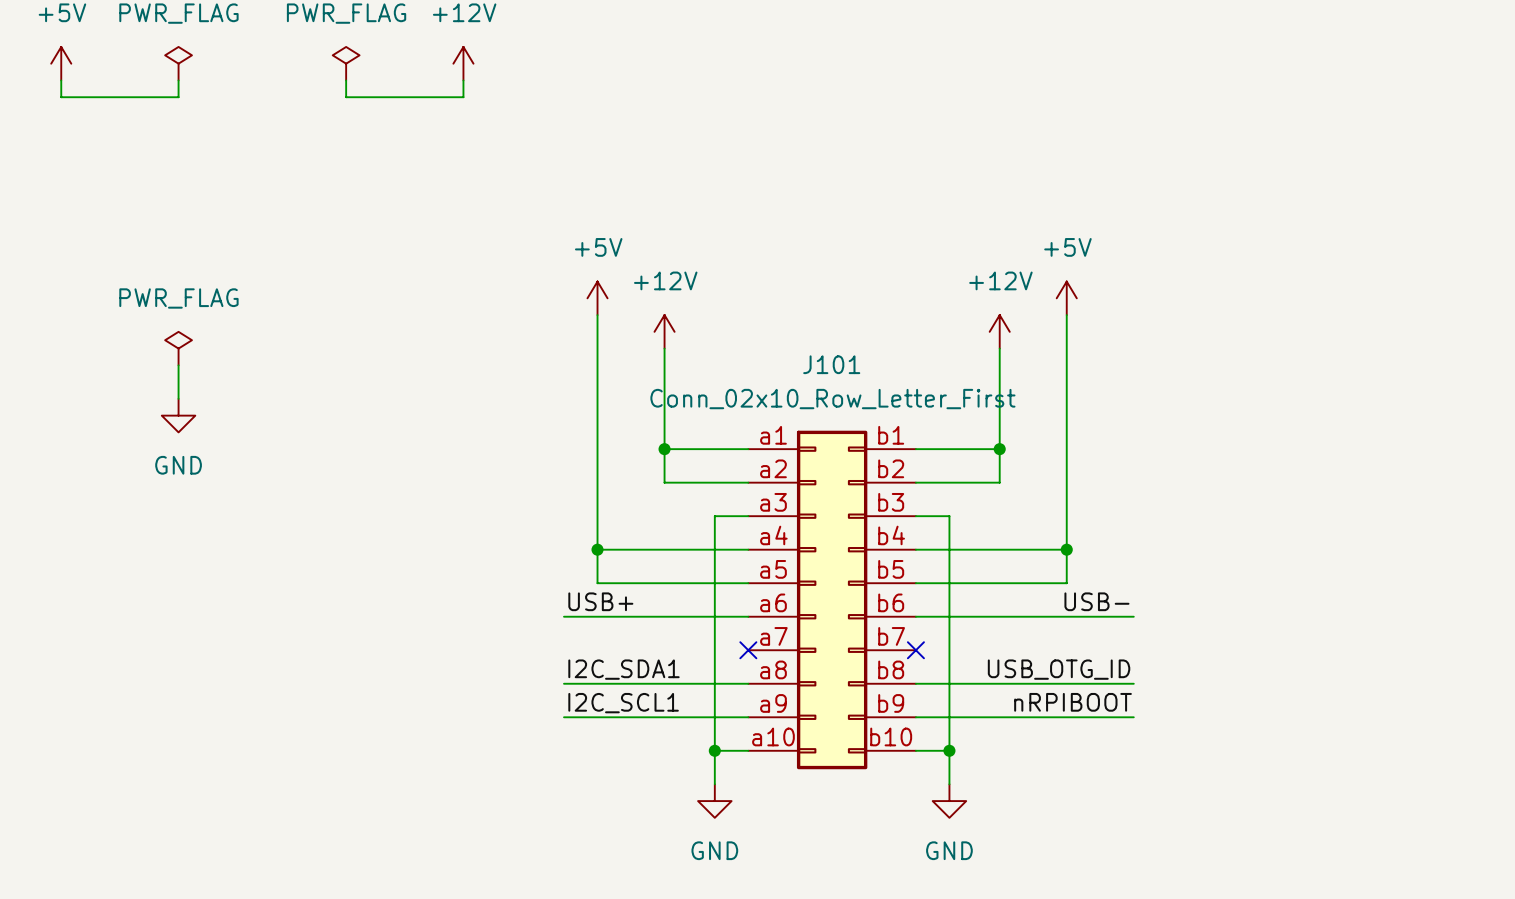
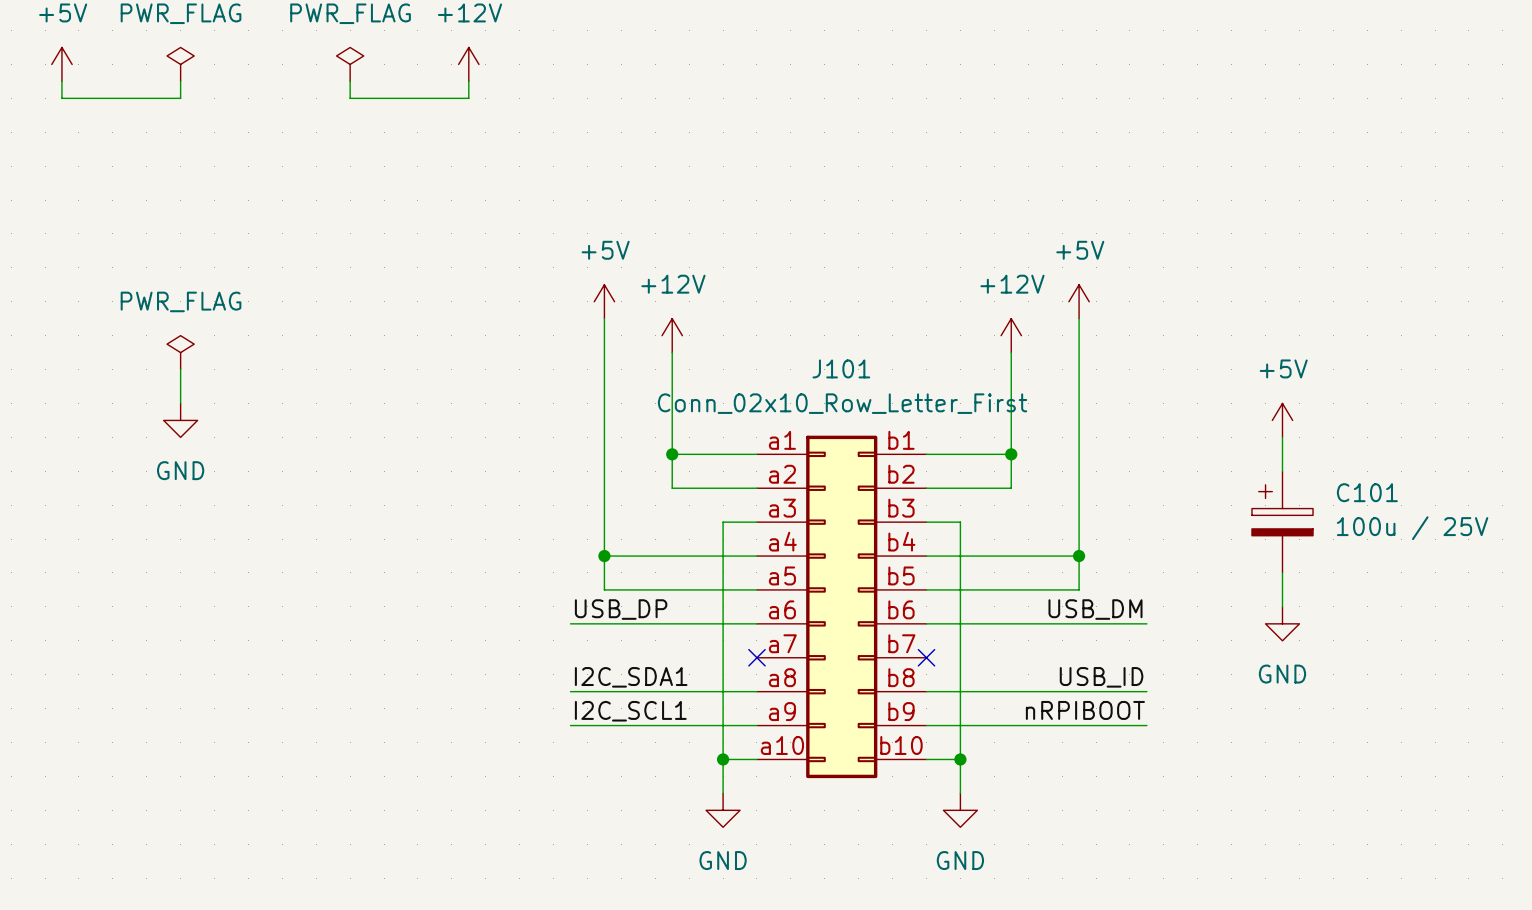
power symbol: none -> +5V (1282, 420)
wire: none -> (1282, 437) (1282, 471)
C101: none -> 100u / 25V (1282, 522)
wire: none -> (1282, 572) (1282, 606)
label: USB+ (600, 601) -> USB_DP (621, 609)
label: USB- (1096, 601) -> USB_DM (1095, 609)
power symbol: none -> GND (1282, 623)
label: USB_OTG_ID (1059, 669) -> USB_ID (1101, 677)

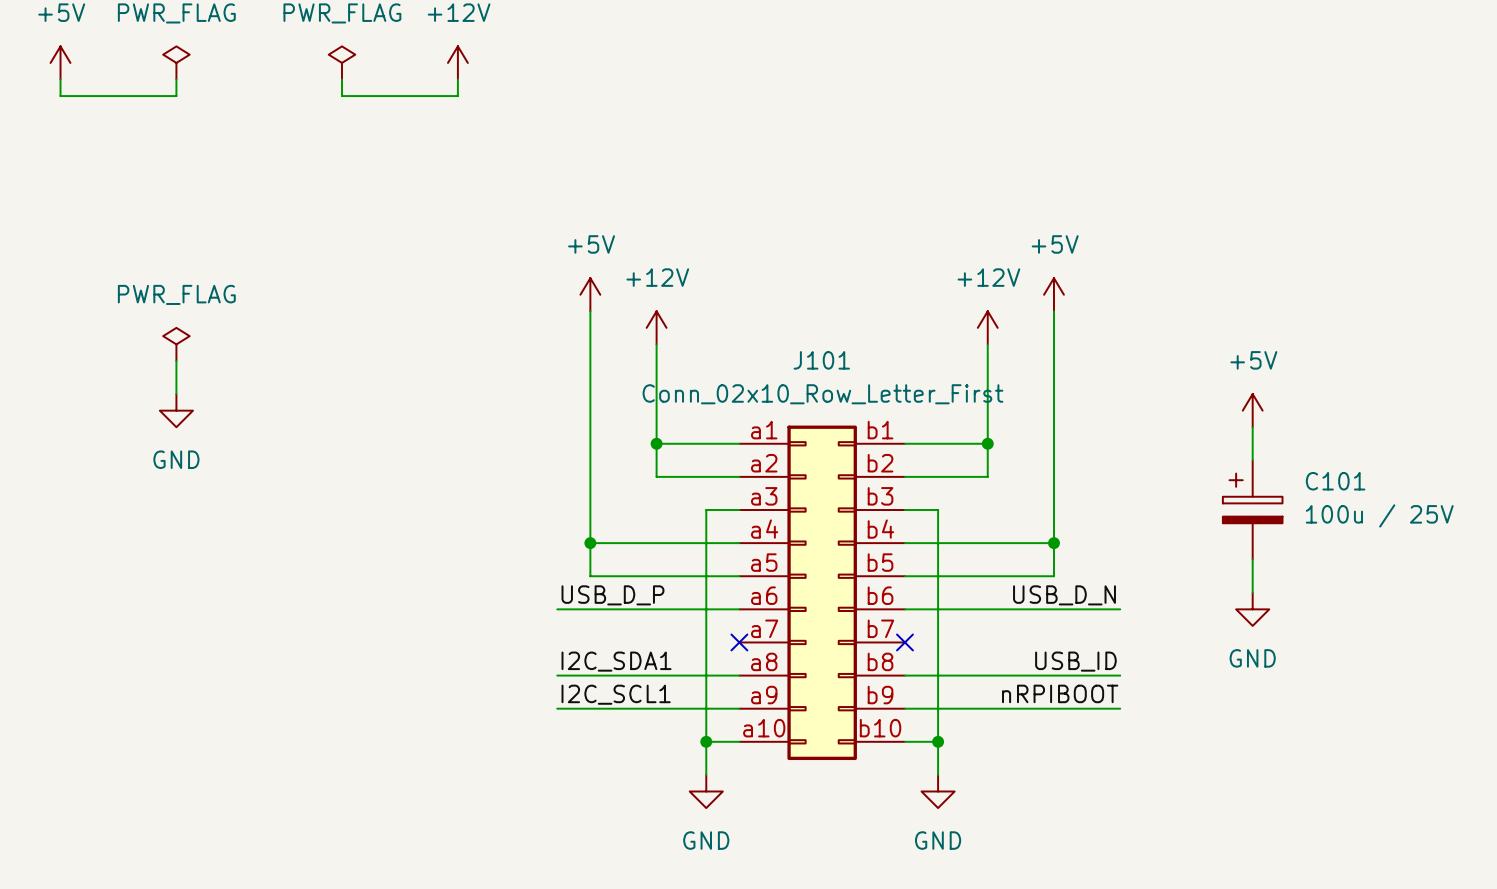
label: USB_DP (621, 609) -> USB_D_P (612, 595)
label: USB_DM (1095, 609) -> USB_D_N (1064, 595)

